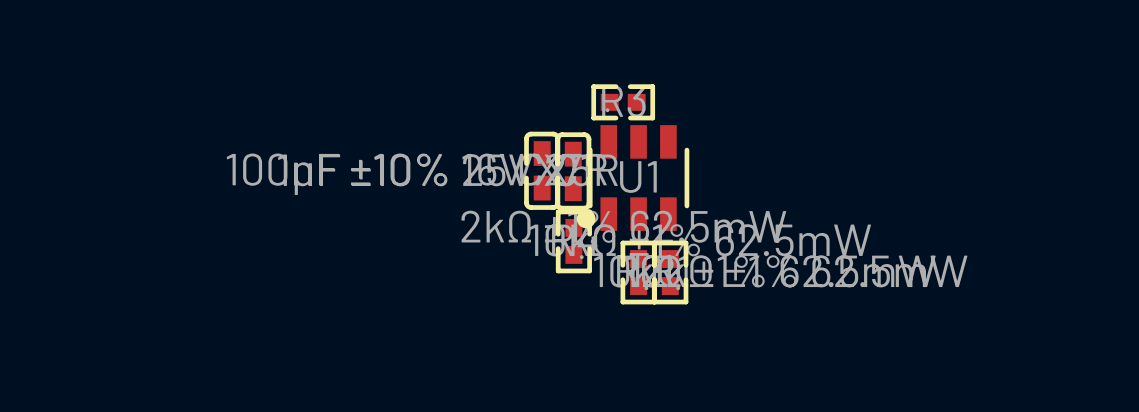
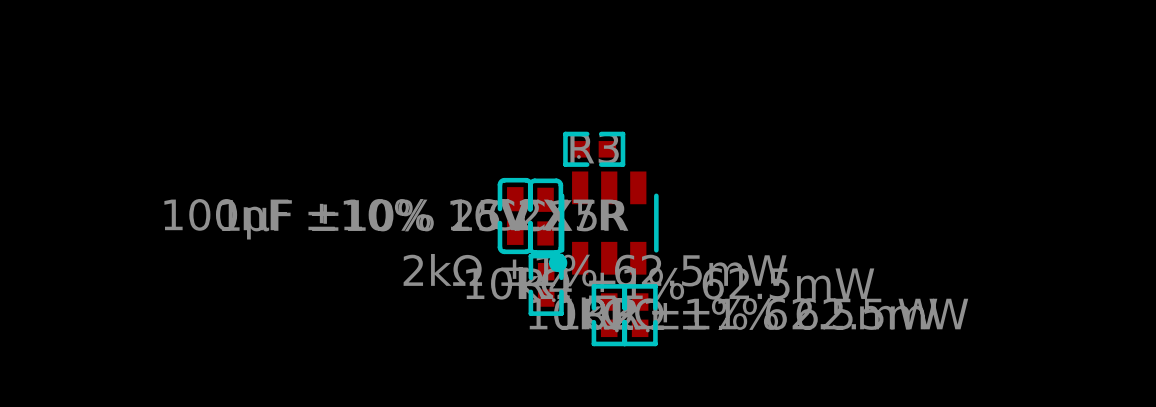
U1 name: U1 (638, 177) -> none

